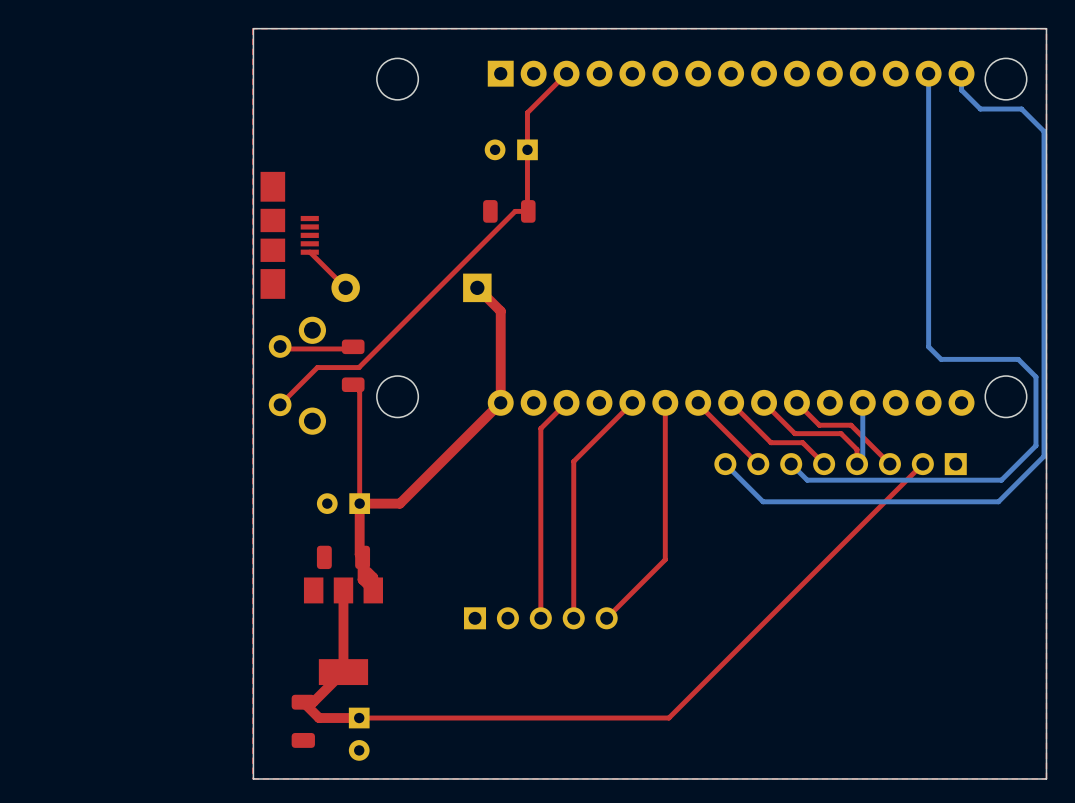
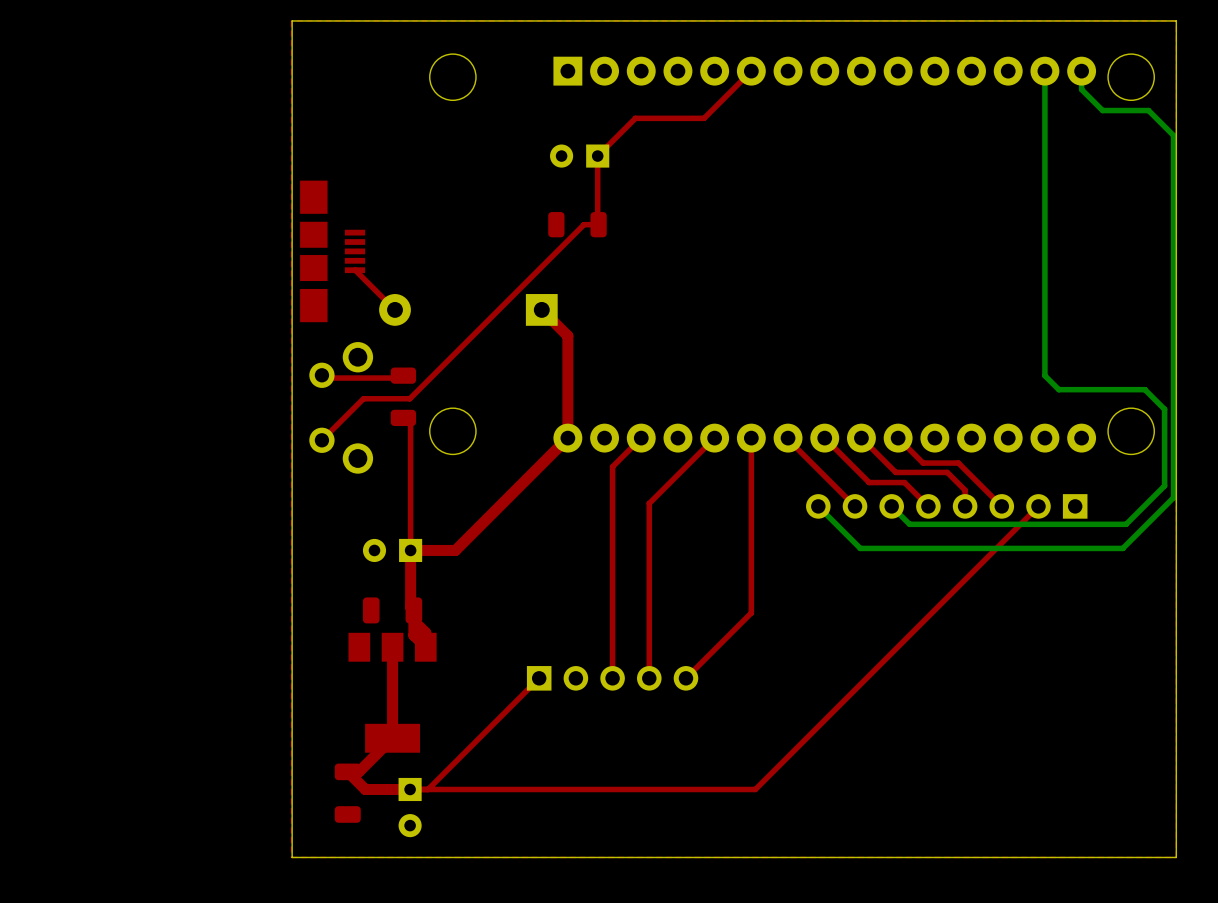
top track: (566, 73) (527, 112) (527, 149) -> (751, 71) (704, 118) (635, 118) (597, 156)
bottom track: (862, 402) (862, 458) -> none
top track: none -> (539, 678) (428, 789)

